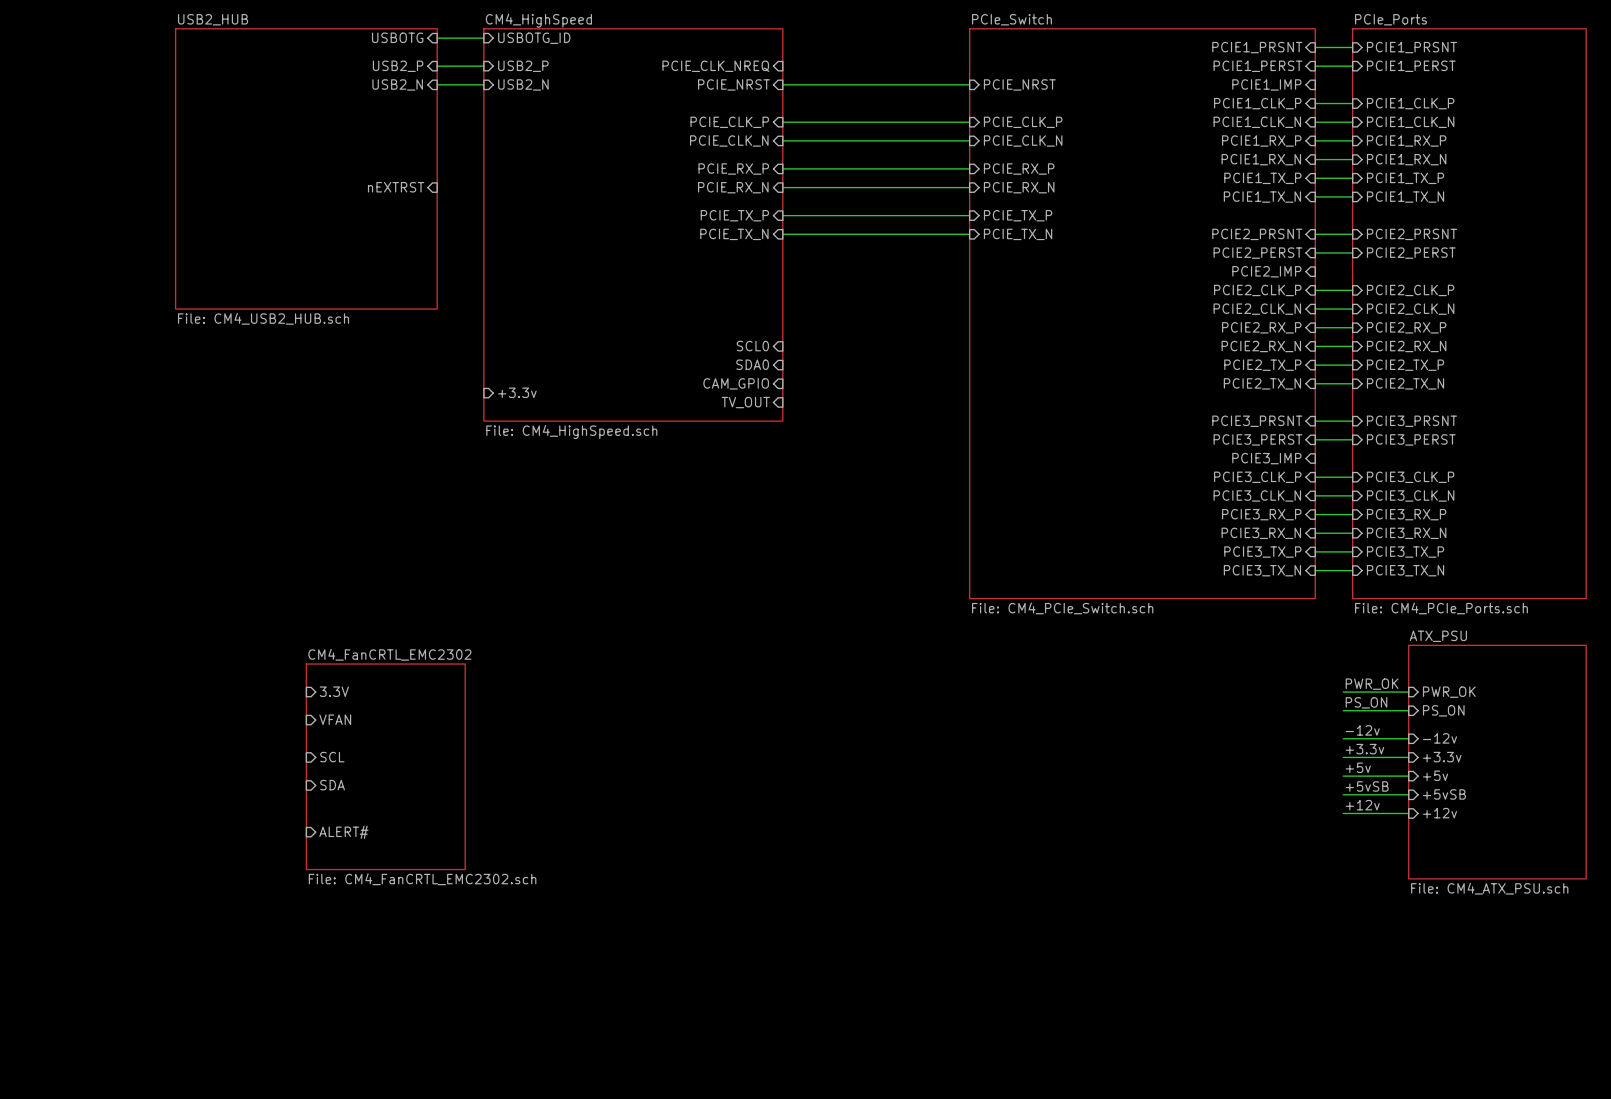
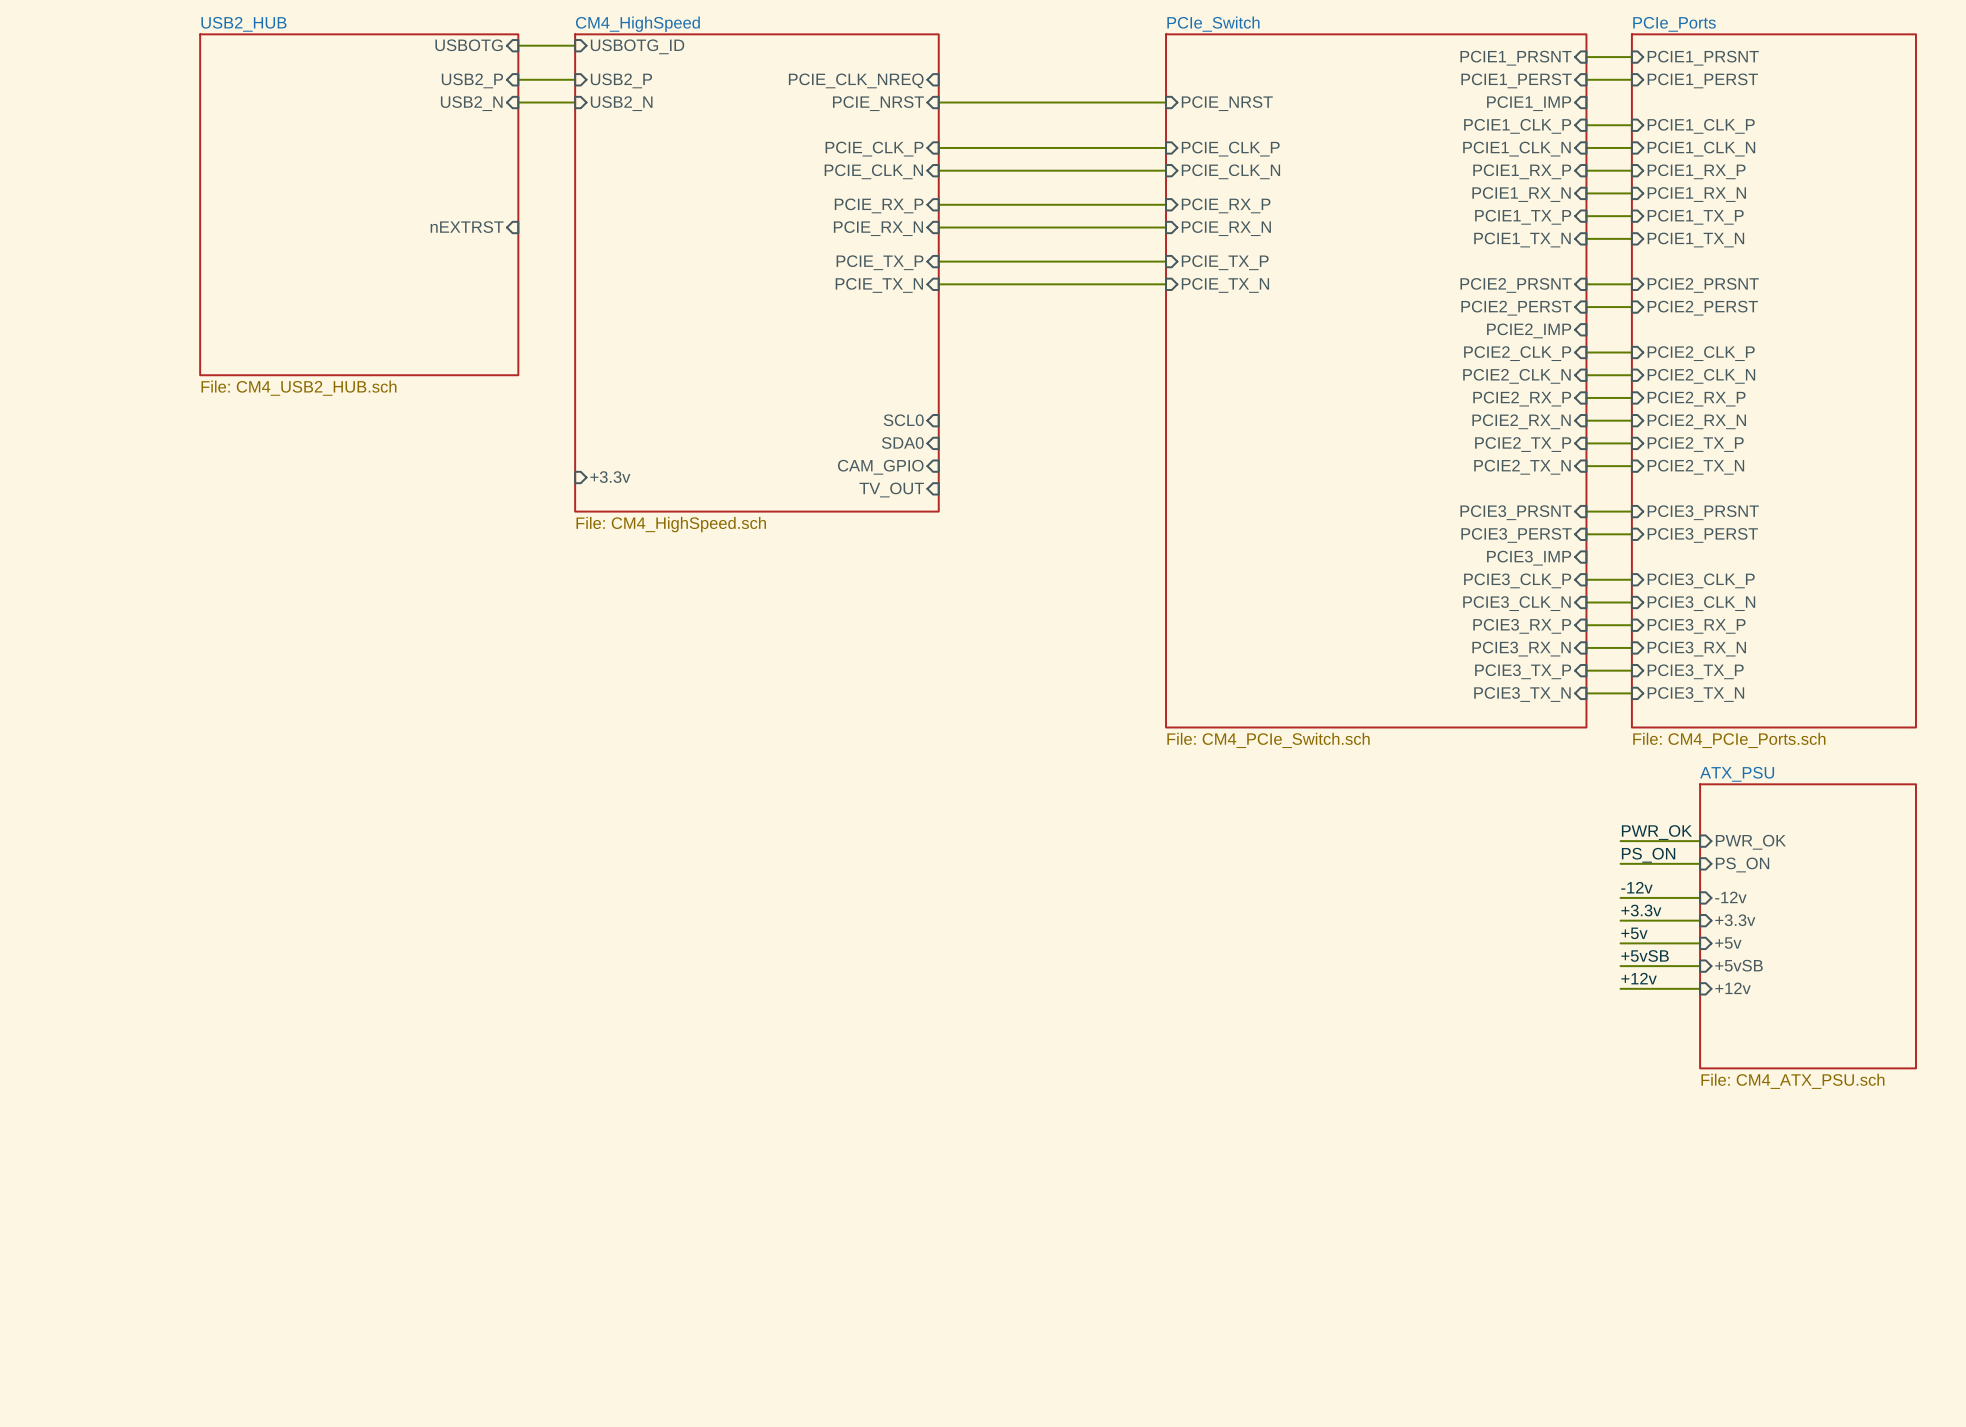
sheet pin: 3.3V (334, 691) -> none
sheet pin: VFAN (335, 719) -> none
sheet pin: SCL (332, 757) -> none
sheet CM4_FanCRTL_EMC2302: File: CM4_FanCRTL_EMC2302.sch (385, 766) -> none
sheet pin: SDA (332, 785) -> none
sheet pin: ALERT# (343, 832) -> none

